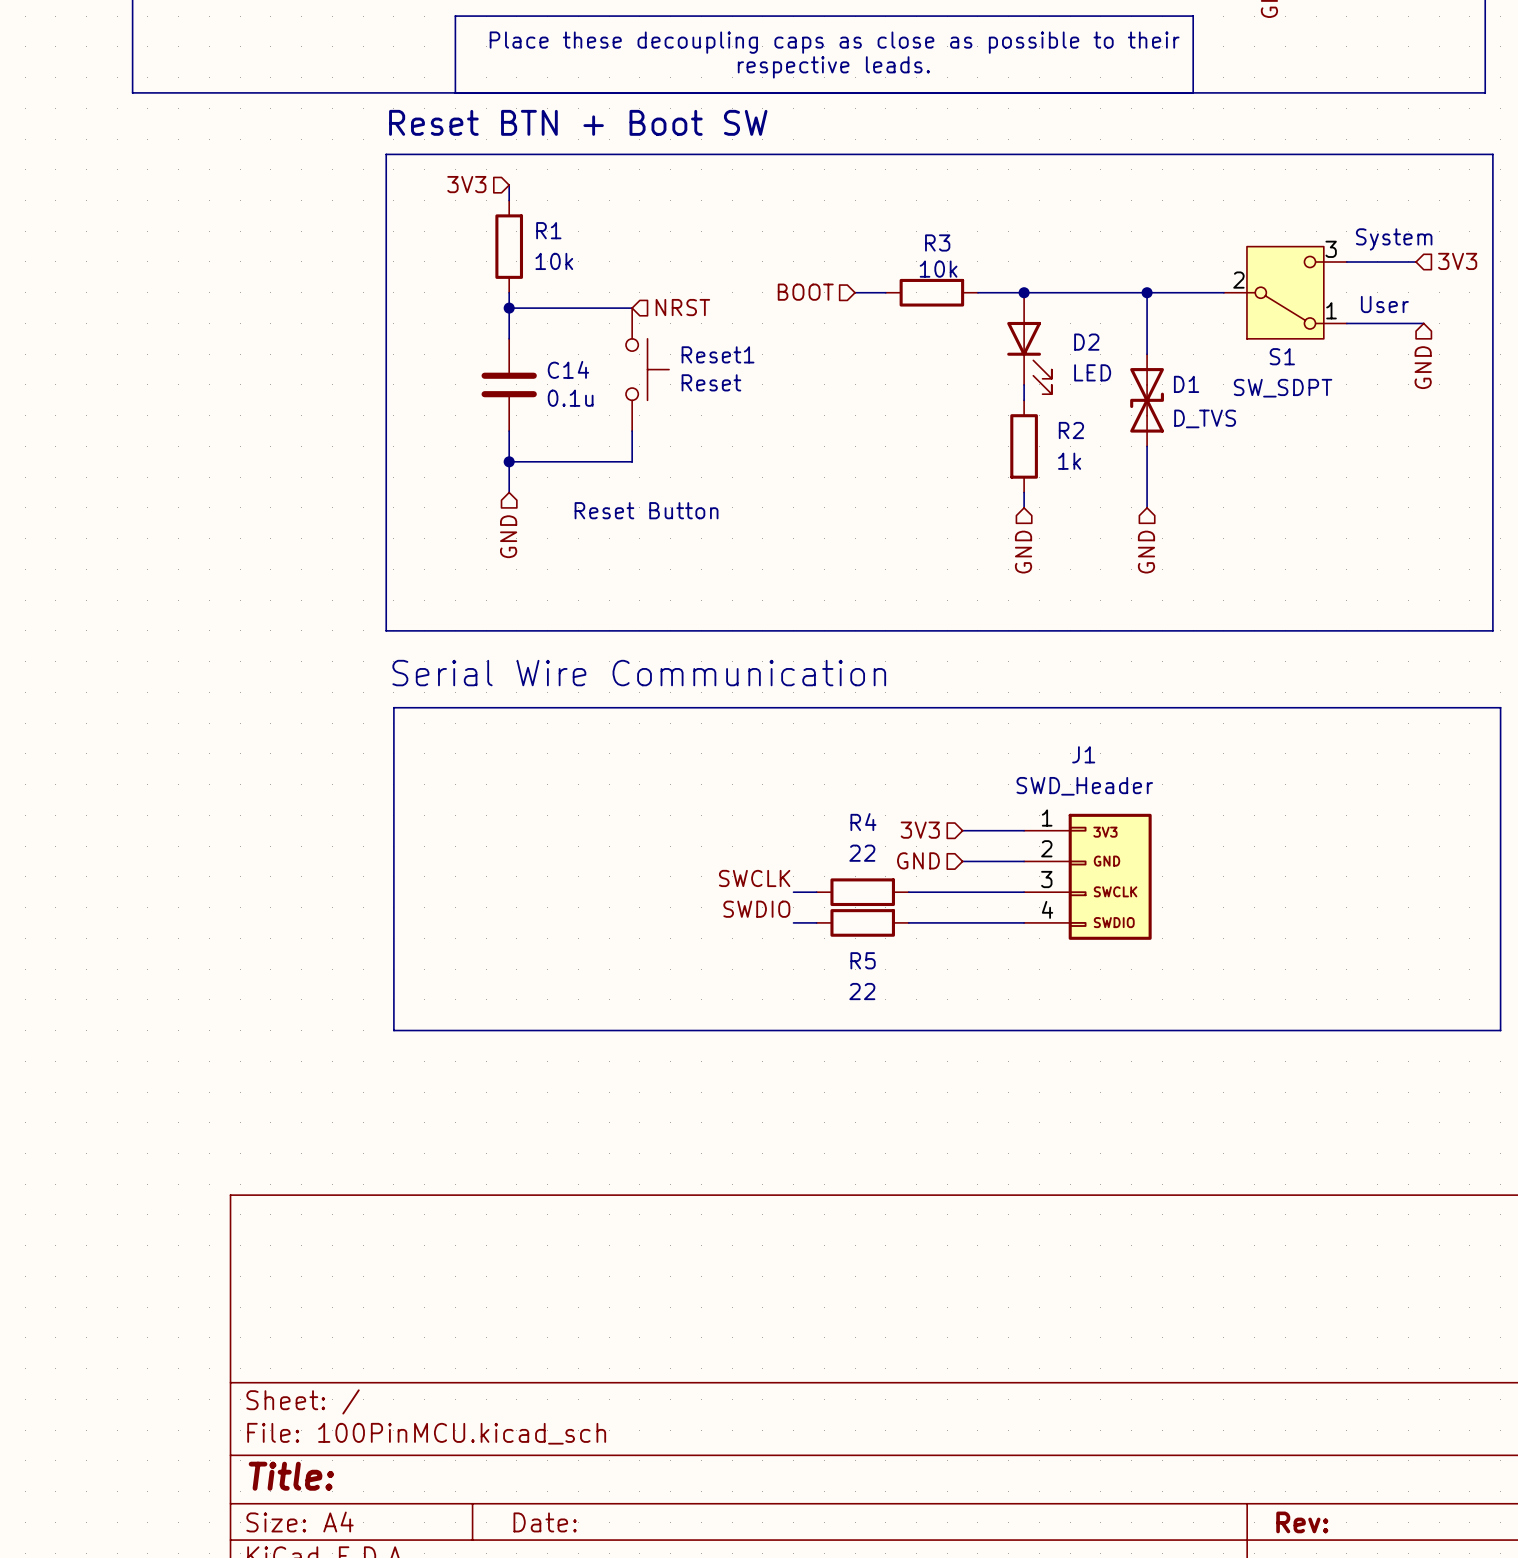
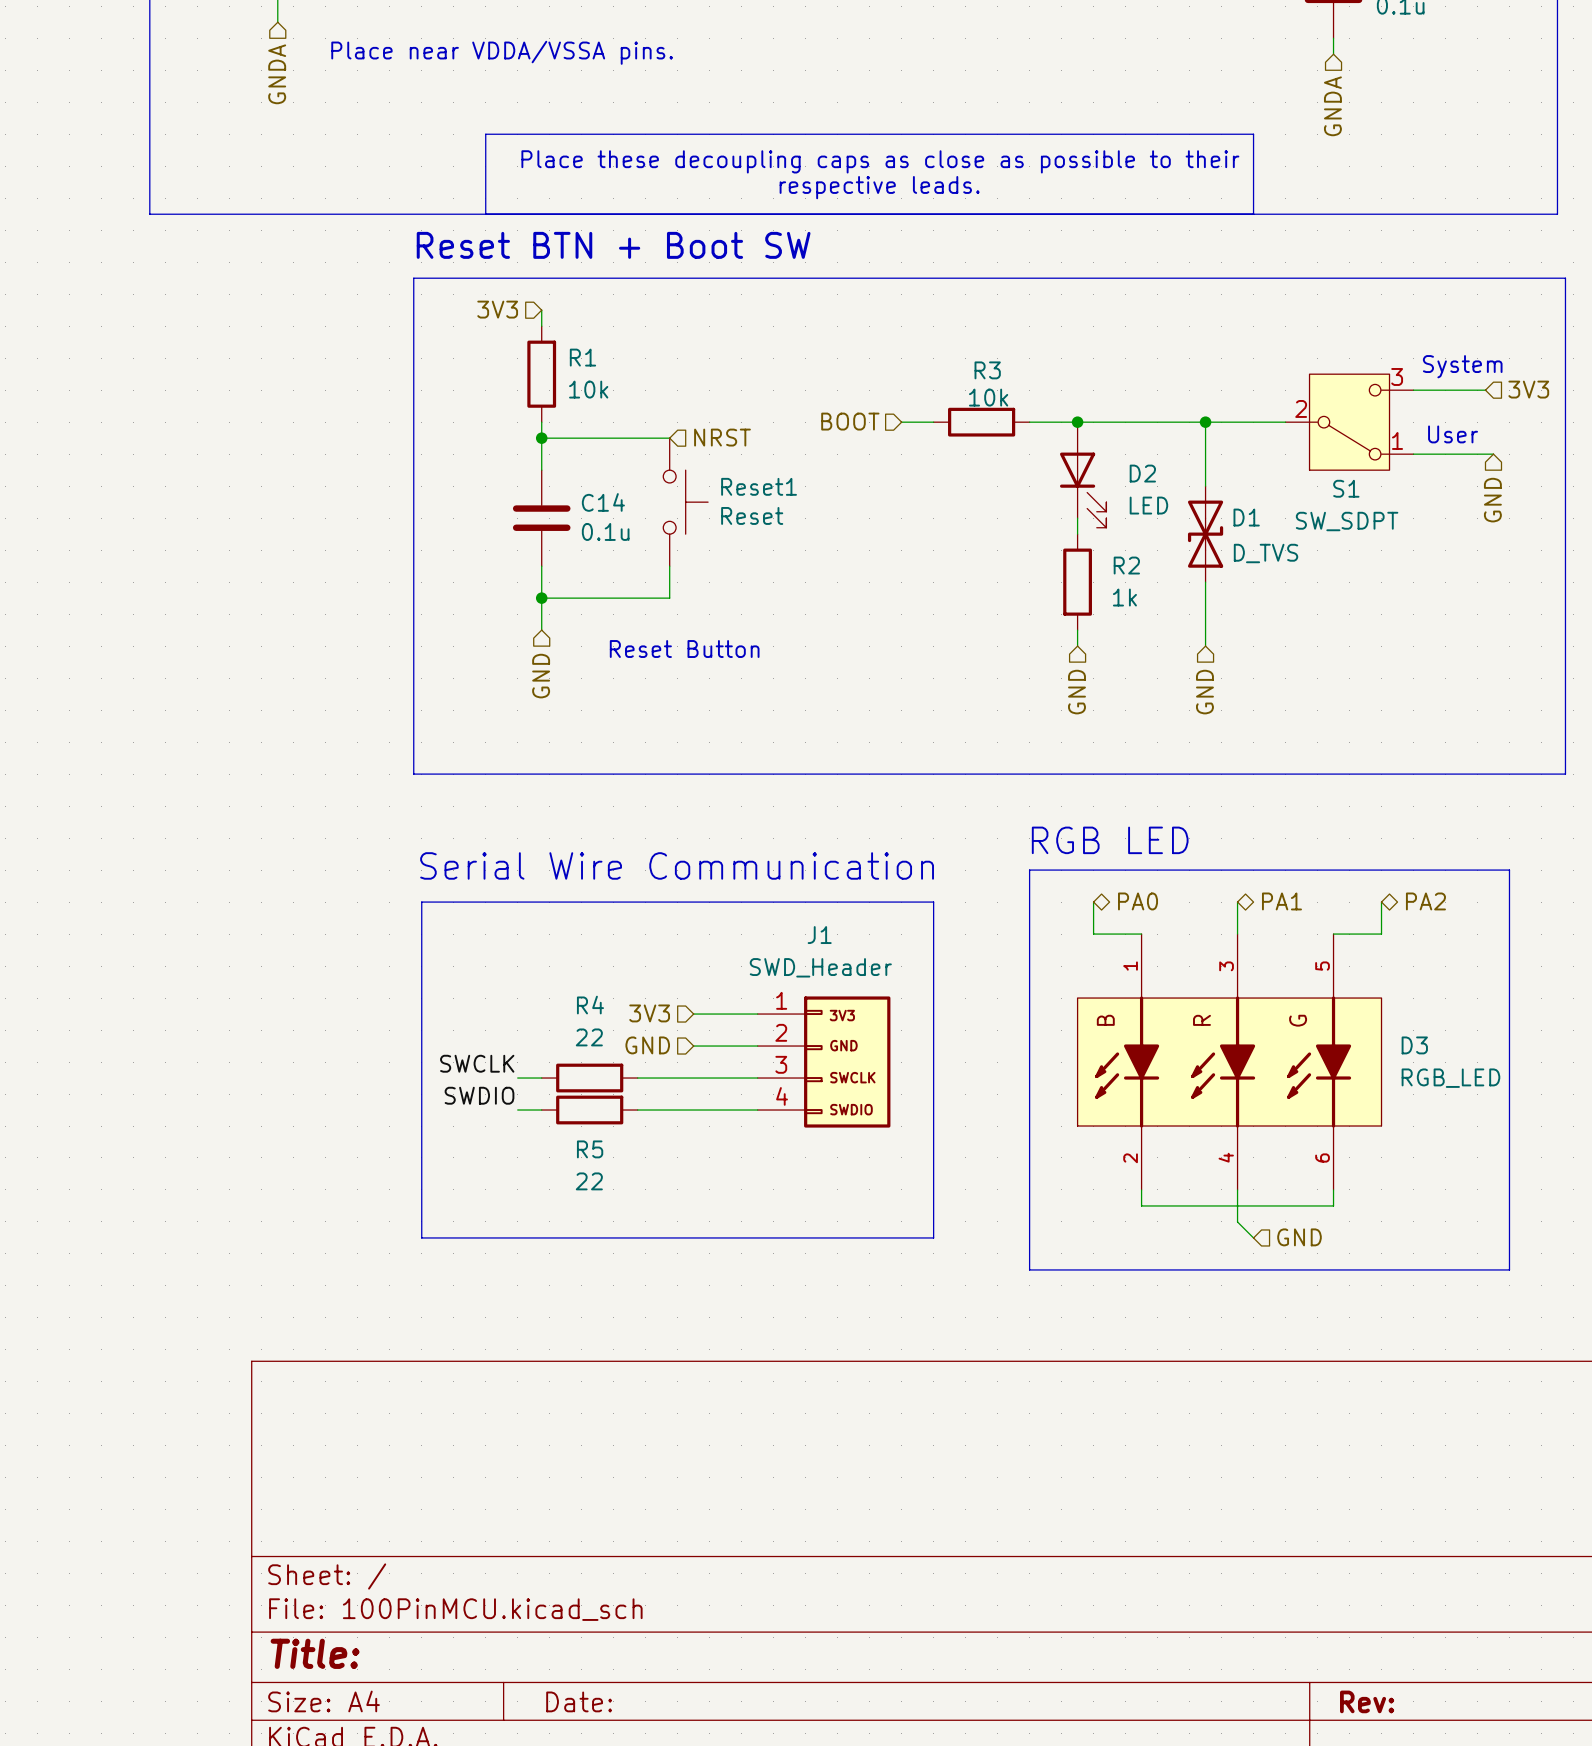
text position: Serial Wire Communication (639, 673) -> Serial Wire Communication (677, 865)
text: none -> RGB LED (1110, 840)
line: none -> (1029, 870) (1509, 870) (1509, 1269) (1029, 1269) (1029, 870)
line: (393, 753) (393, 707) (1500, 707) (1500, 1030) (393, 1030) -> (421, 902) (933, 902) (933, 1237) (421, 1237) (421, 1189)
wire: none -> (1093, 902) (1093, 934) (1141, 934)
hierarchical label: none -> PA0 (1138, 901)
wire: none -> (1237, 902) (1237, 934)
hierarchical label: none -> PA1 (1281, 901)
wire: none -> (1381, 902) (1381, 934) (1333, 934)
hierarchical label: none -> PA2 (1425, 901)
hierarchical label: 3V3 (920, 830) -> none
wire: (962, 830) (1024, 830) -> none
hierarchical label: none -> 3V3 (649, 1013)
hierarchical label: GND (918, 860) -> none
wire: none -> (693, 1014) (757, 1014)
wire: (962, 861) (1024, 861) -> none
J1 position: (1087, 876) -> (824, 1062)
label: SWCLK (754, 878) -> none
hierarchical label: none -> GND (647, 1045)
wire: none -> (693, 1046) (757, 1046)
R4 position: (862, 892) -> (589, 1078)
wire: (908, 892) (1024, 892) -> none
D3: none -> RGB_LED (1229, 1062)
label: none -> SWCLK (477, 1063)
label: SWDIO (756, 909) -> none
wire: none -> (517, 1078) (541, 1078)
wire: none -> (637, 1078) (757, 1078)
R5 position: (862, 922) -> (589, 1110)
wire: (908, 922) (1024, 922) -> none
label: none -> SWDIO (479, 1095)
wire: none -> (517, 1110) (541, 1110)
wire: none -> (637, 1110) (757, 1110)
wire: none -> (1141, 1189) (1141, 1205) (1333, 1205) (1333, 1189)
wire: none -> (1237, 1189) (1237, 1221) (1253, 1237)
hierarchical label: none -> GND (1299, 1237)

